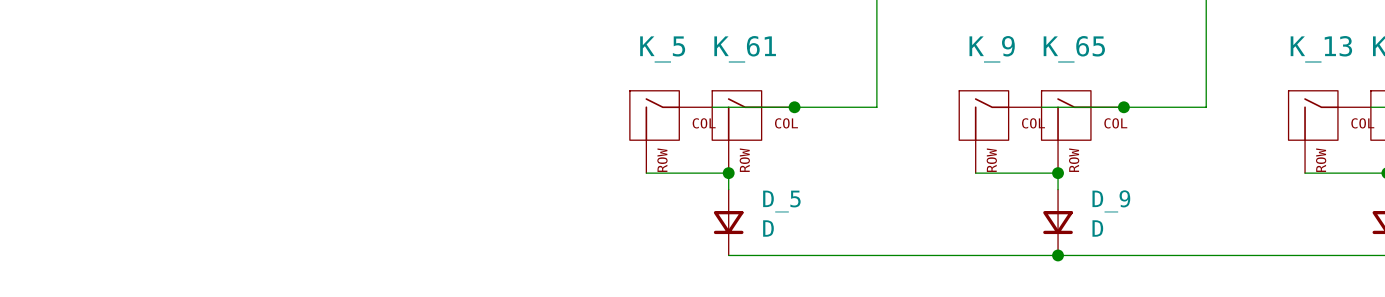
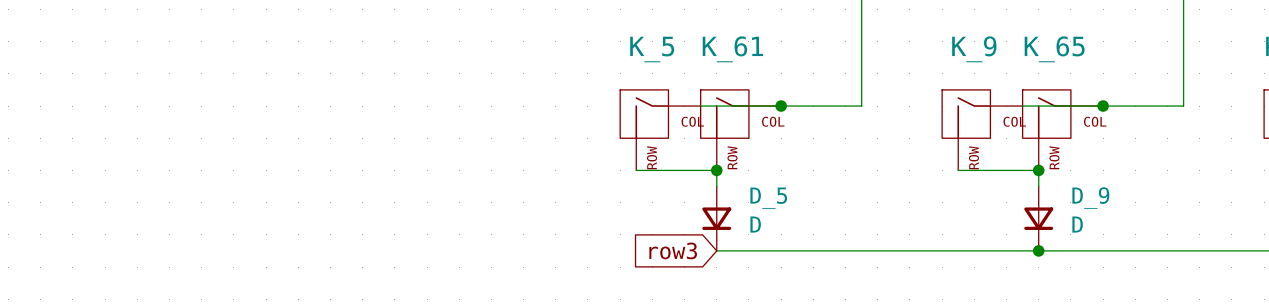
global label: none -> row3 (673, 250)

